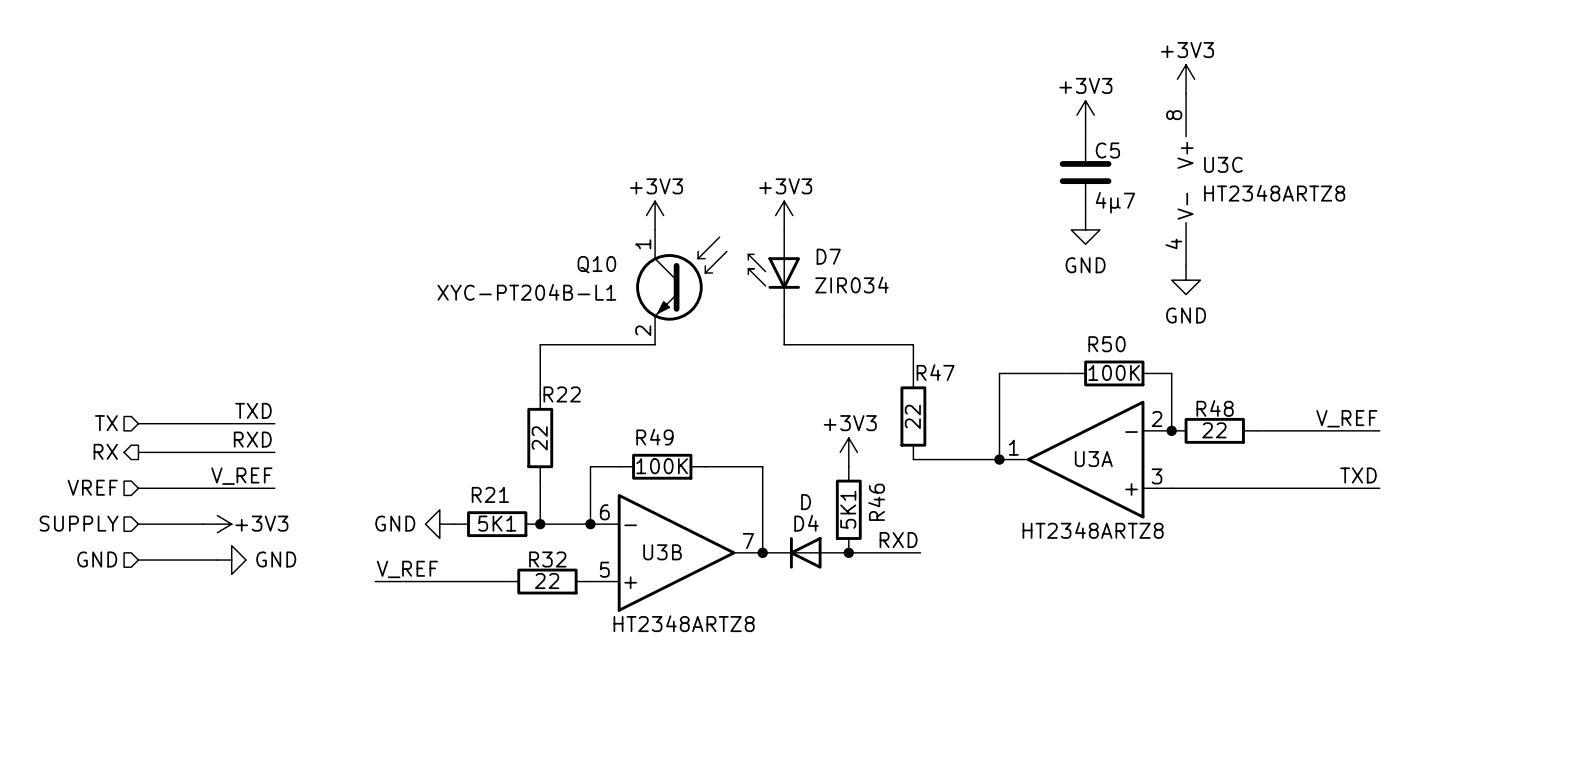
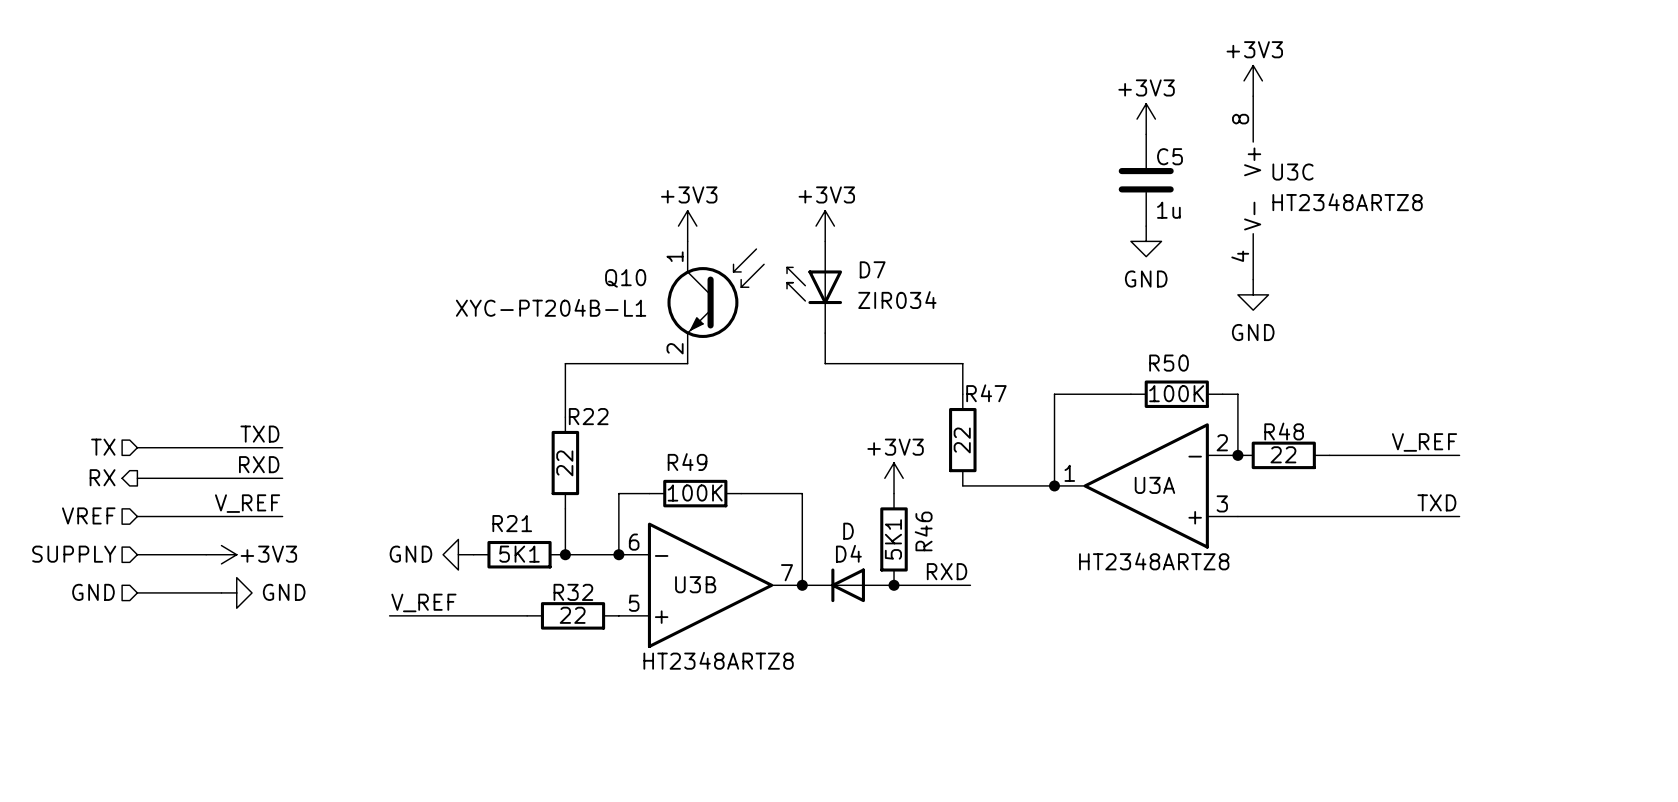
C5 value: 4µ7 (1115, 202) -> 1u (1168, 210)

